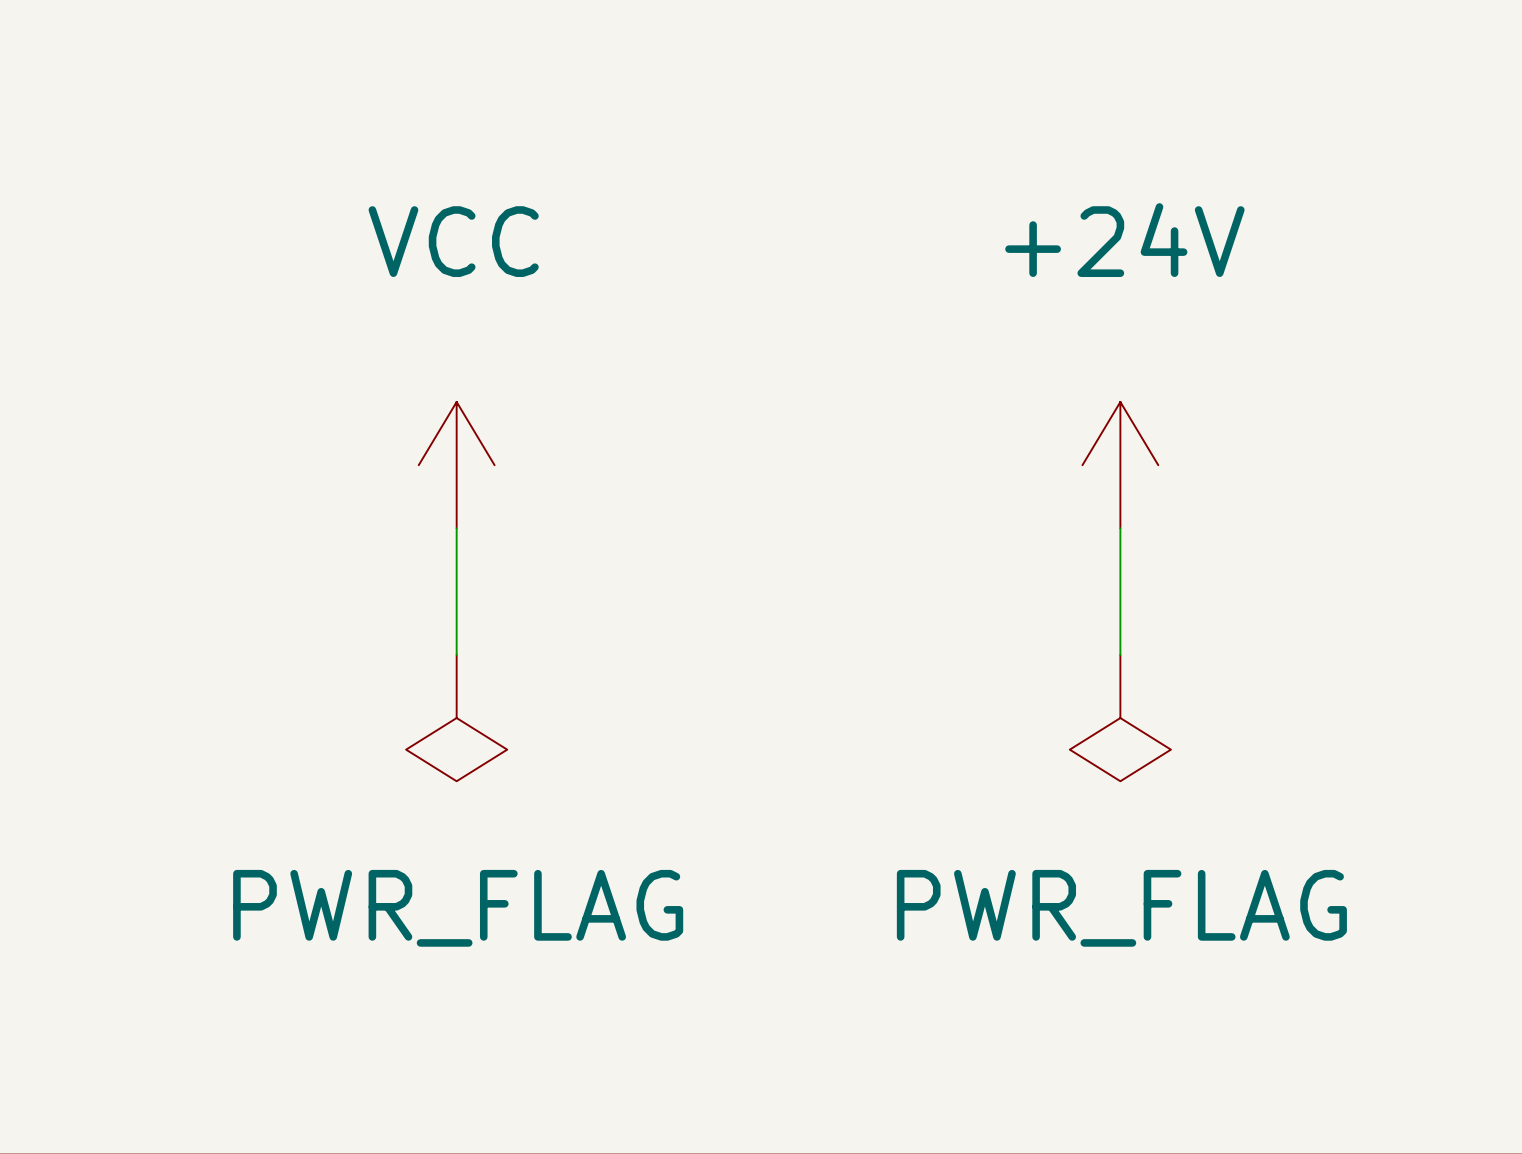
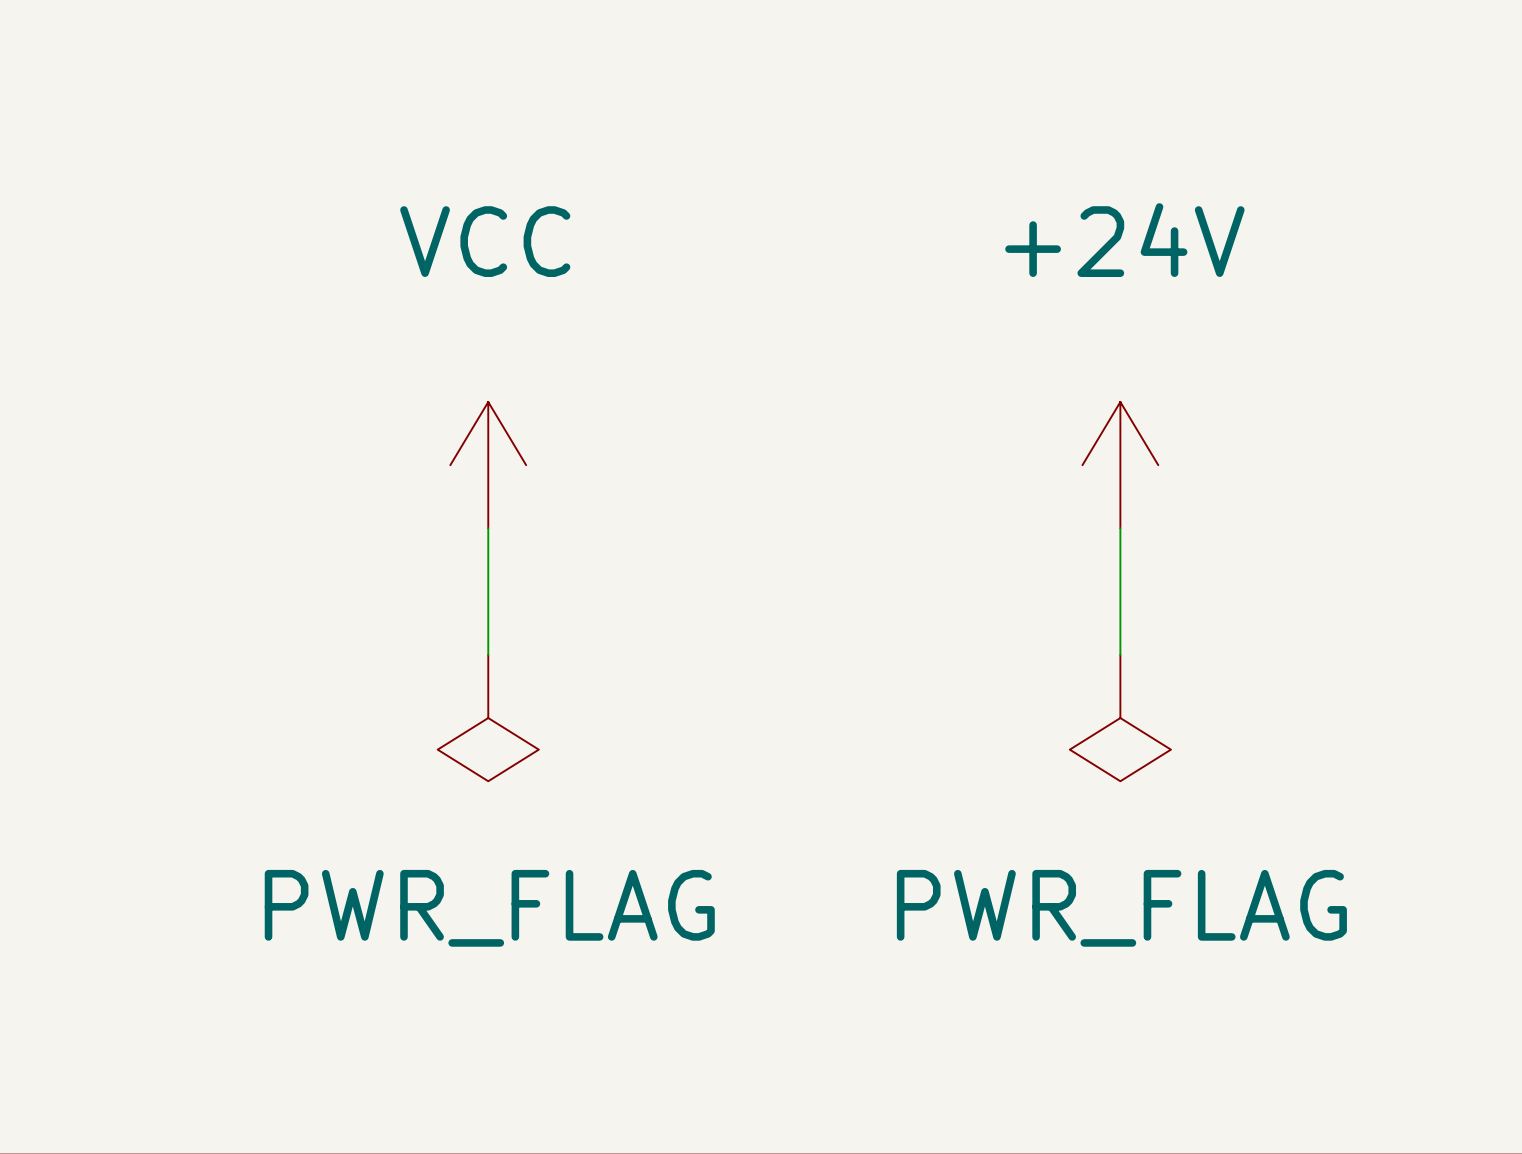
power symbol position: VCC (456, 465) -> VCC (488, 465)
wire: (456, 528) (456, 654) -> (488, 528) (488, 654)
power symbol position: PWR_FLAG (456, 718) -> PWR_FLAG (488, 718)

